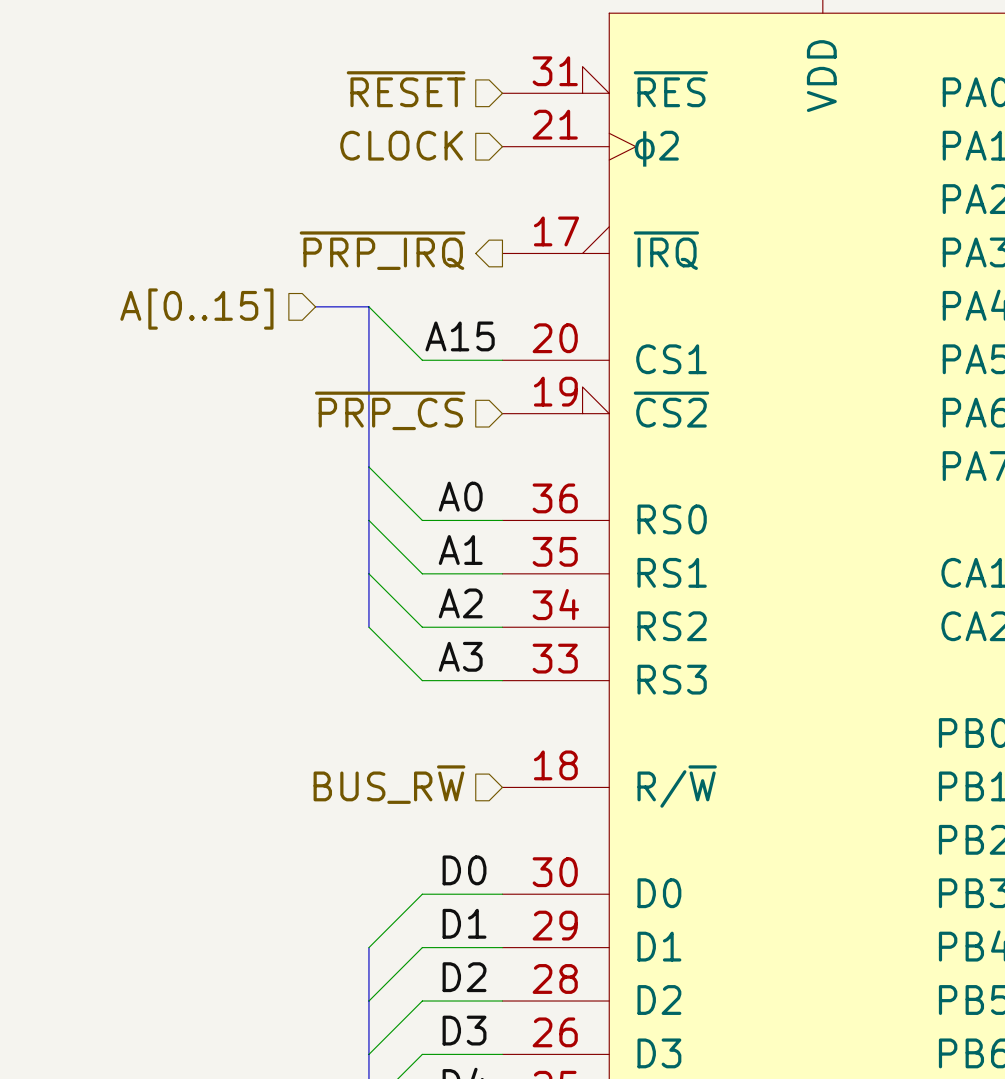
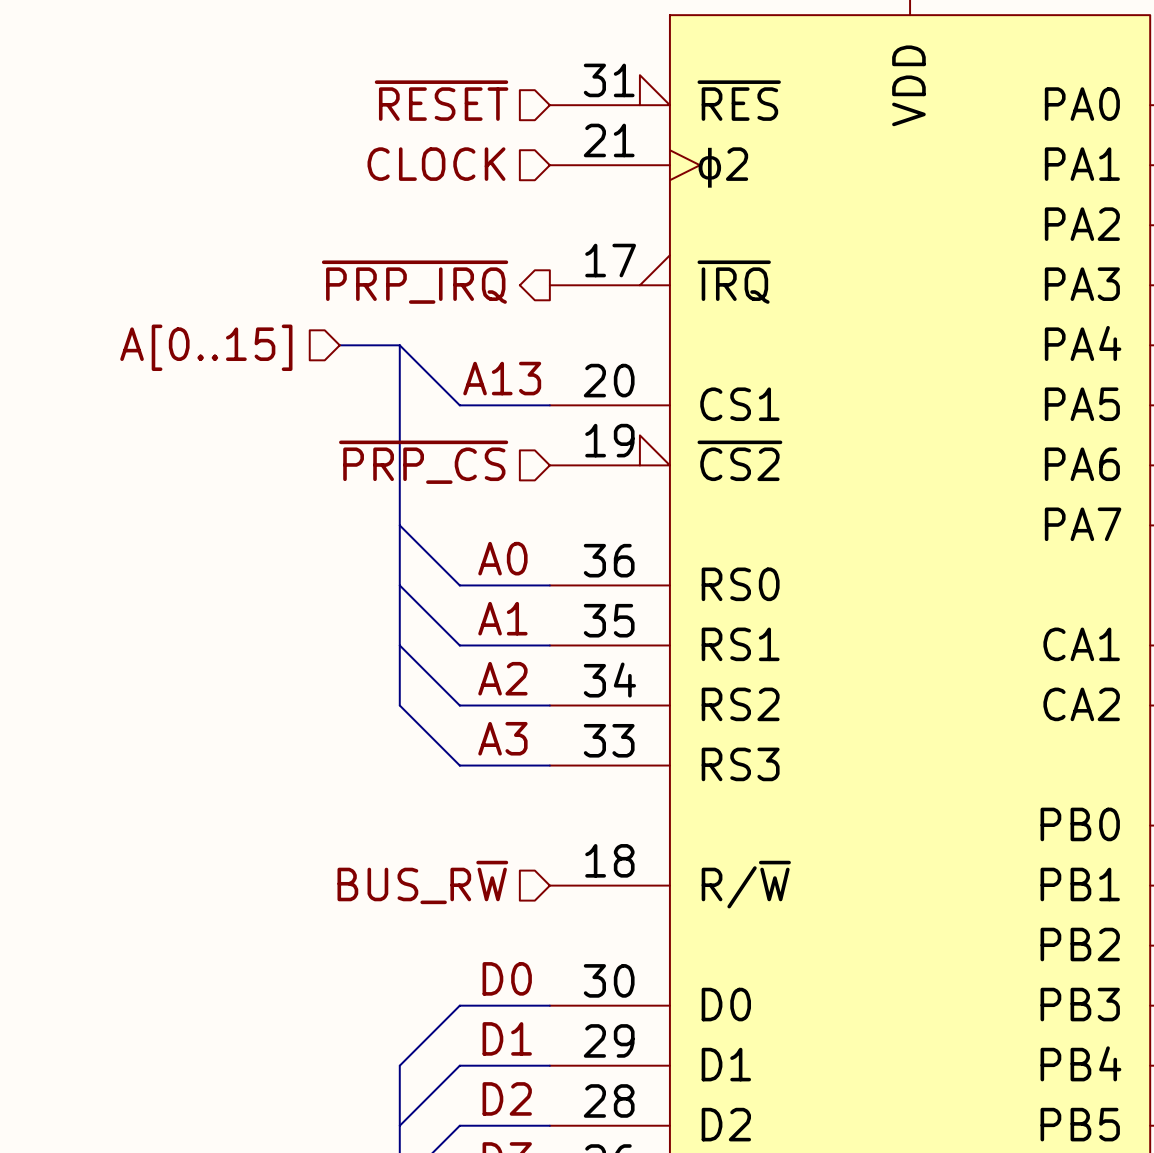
label: A15 (460, 336) -> A13 (502, 378)

